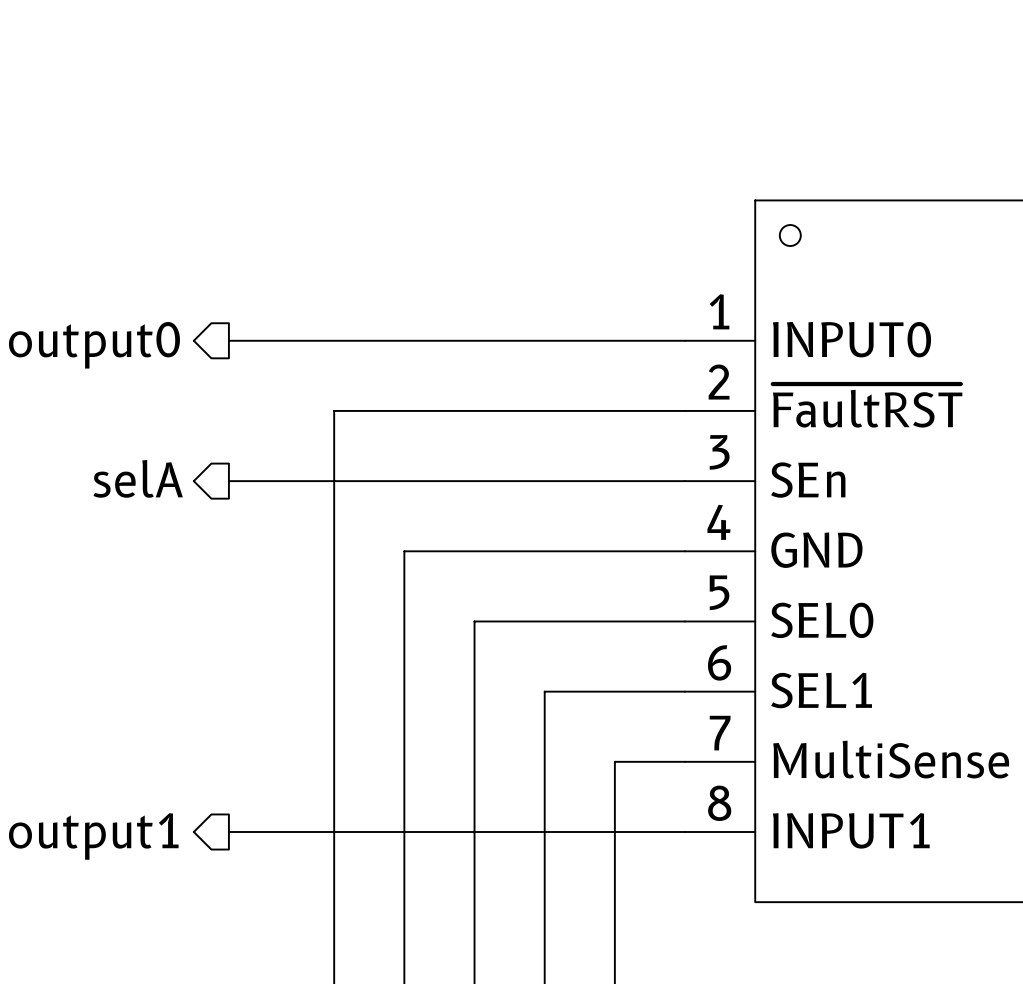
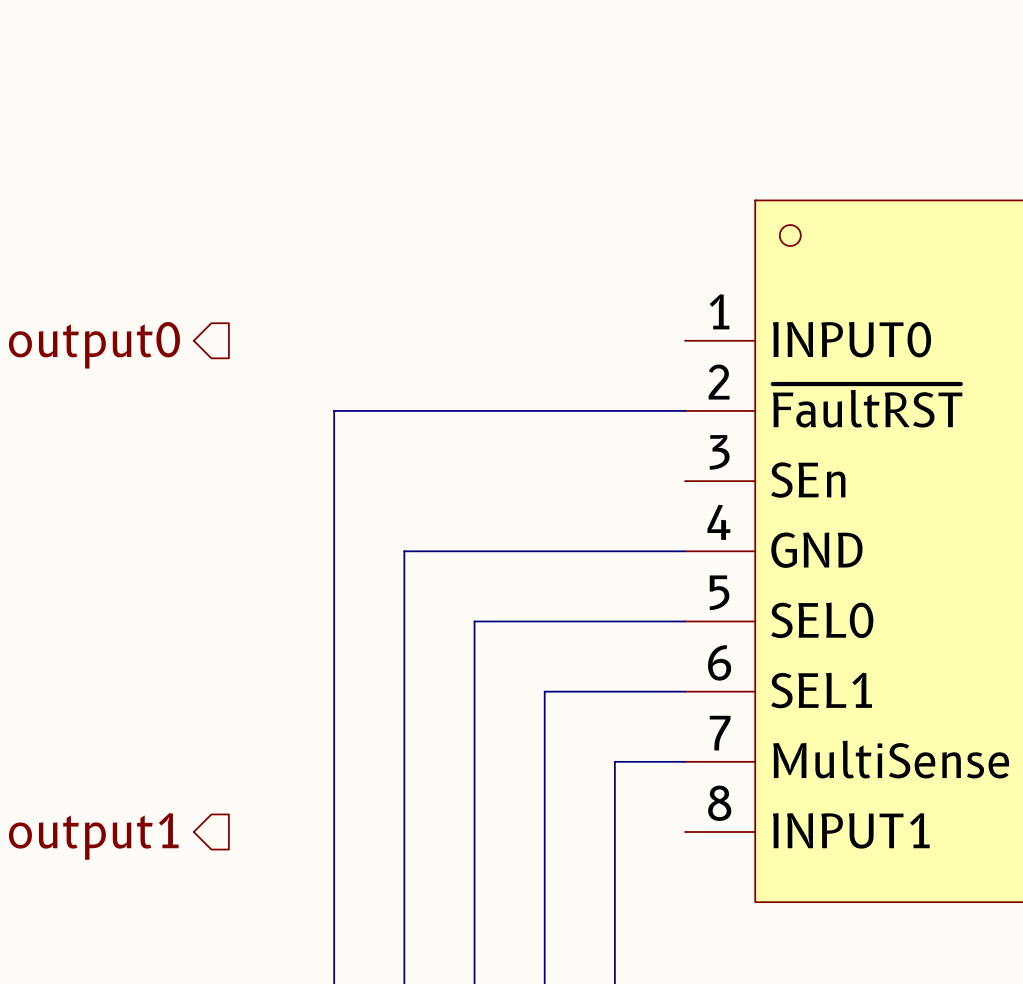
wire: (228, 340) (685, 340) -> none
hierarchical label: selA (138, 478) -> none
wire: (228, 481) (685, 481) -> none
wire: (228, 831) (685, 831) -> none

